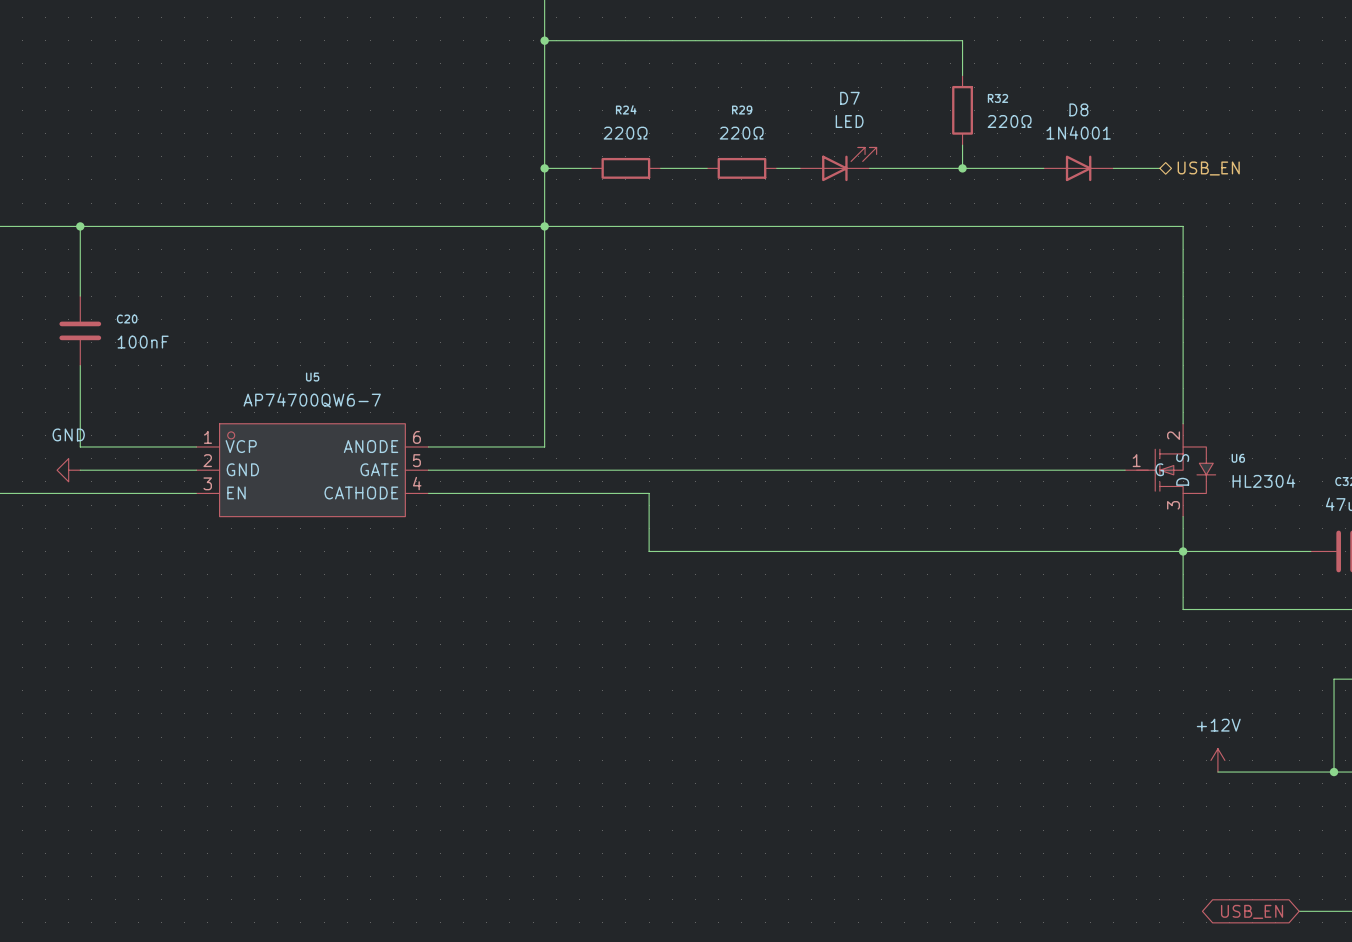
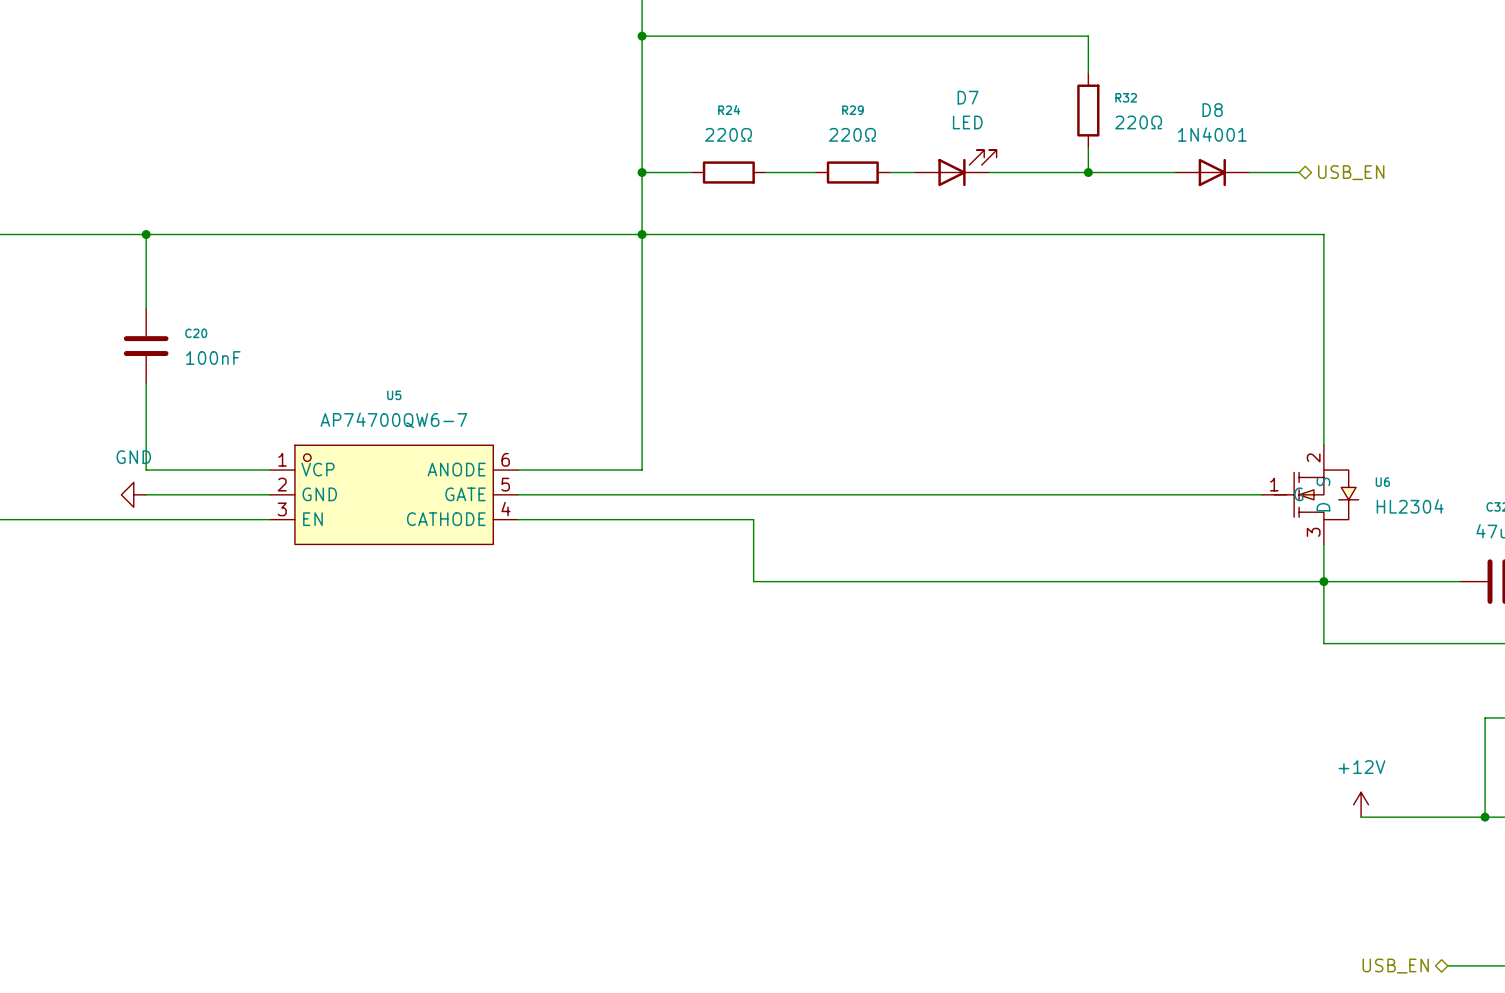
hierarchical label: none -> USB_EN (1395, 966)
global label: USB_EN (1252, 911) -> none

